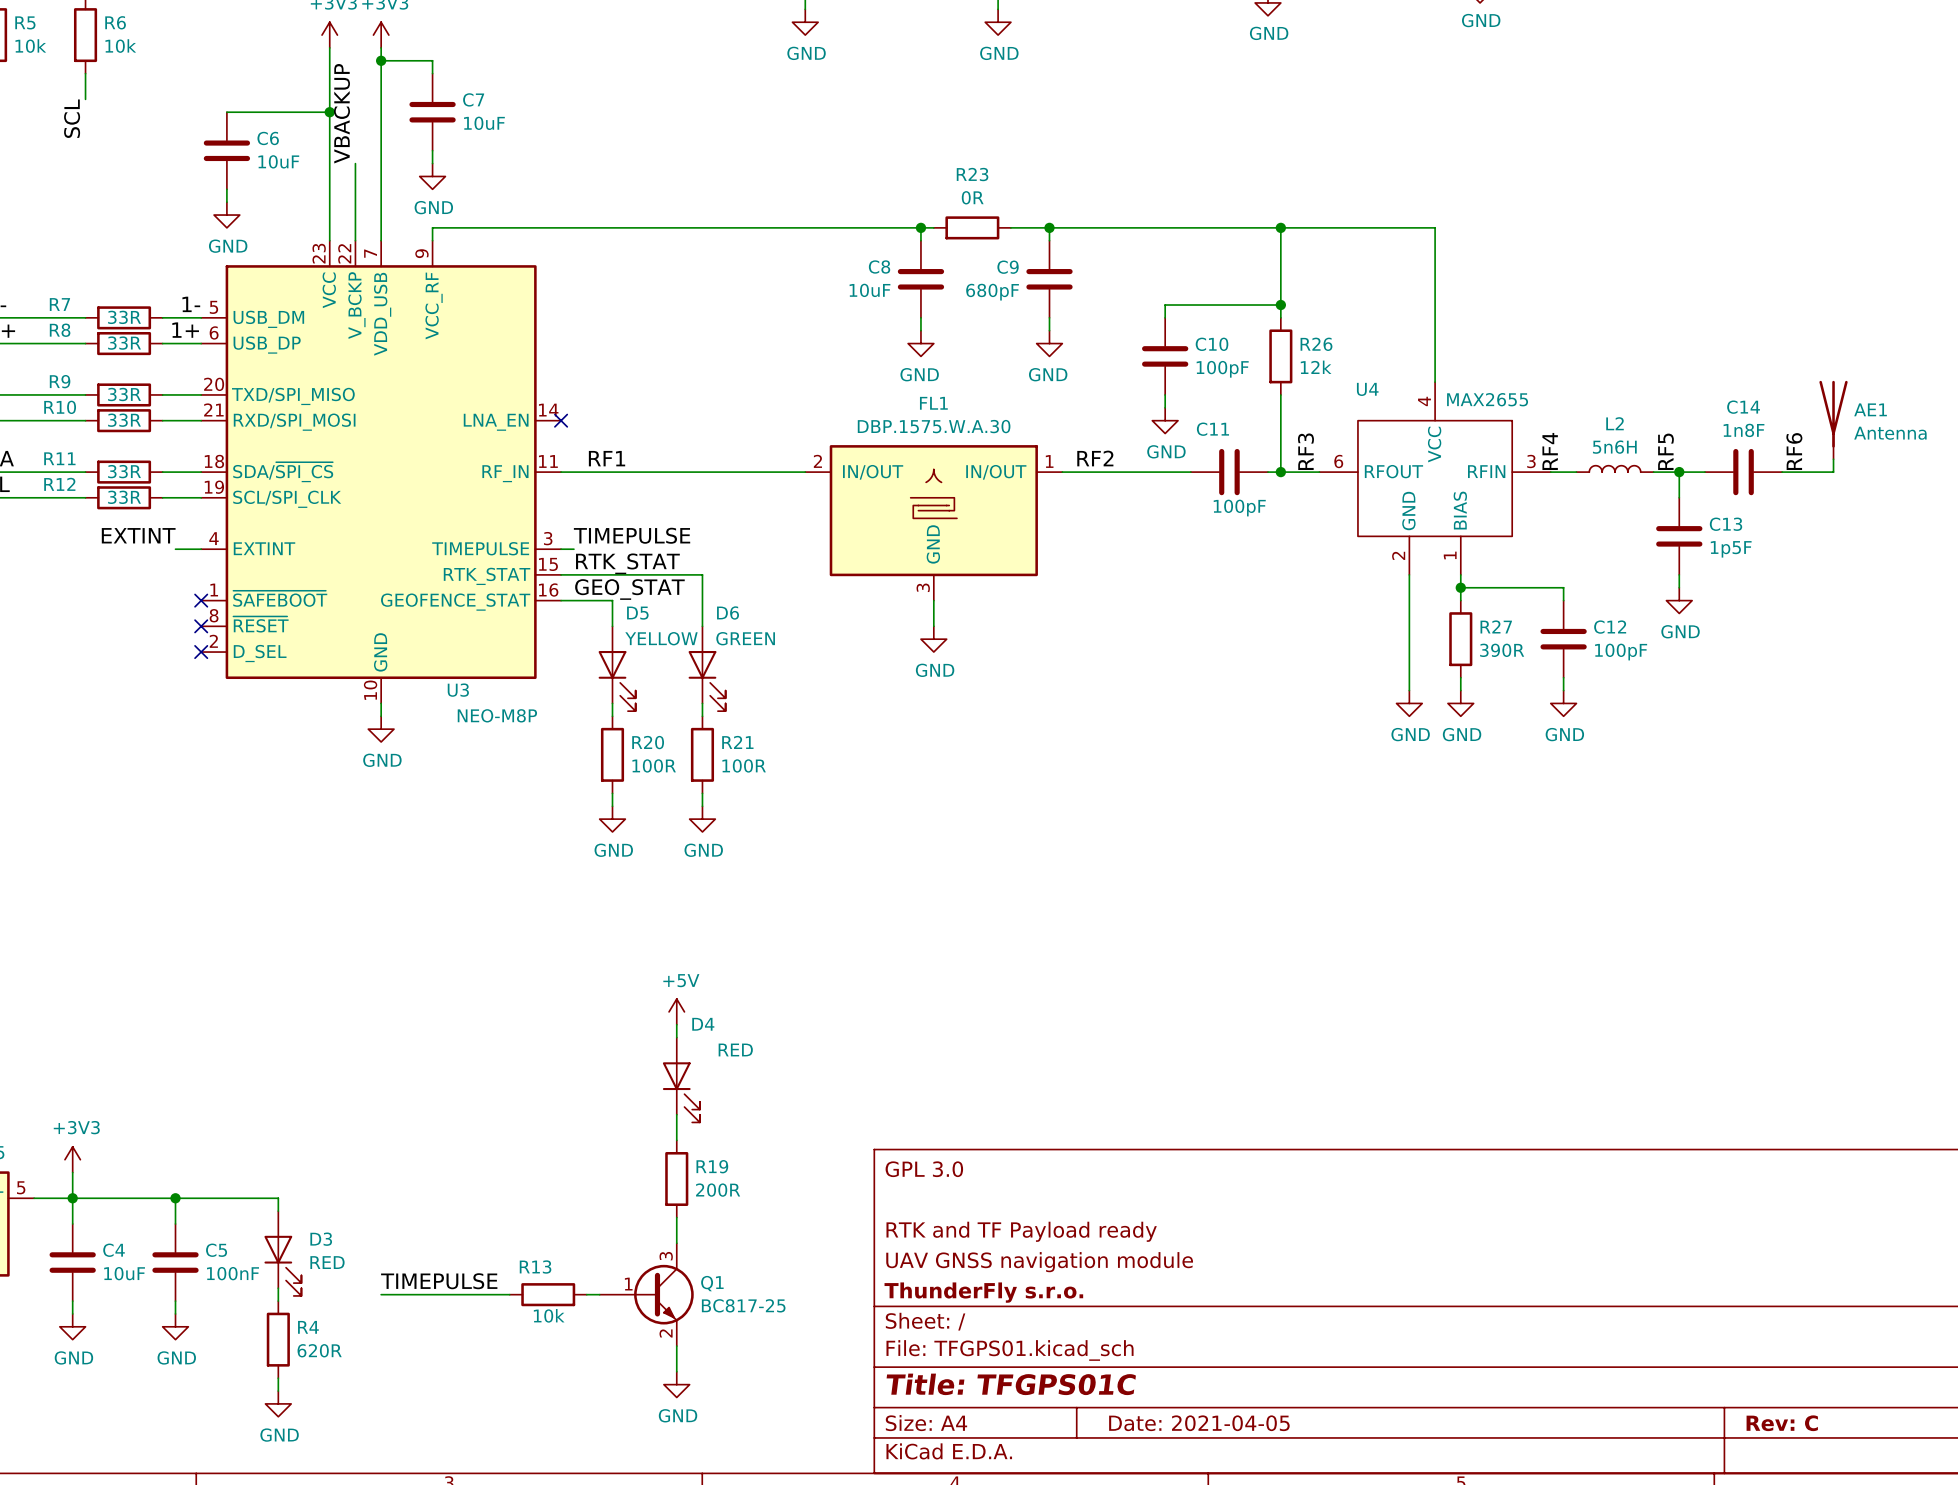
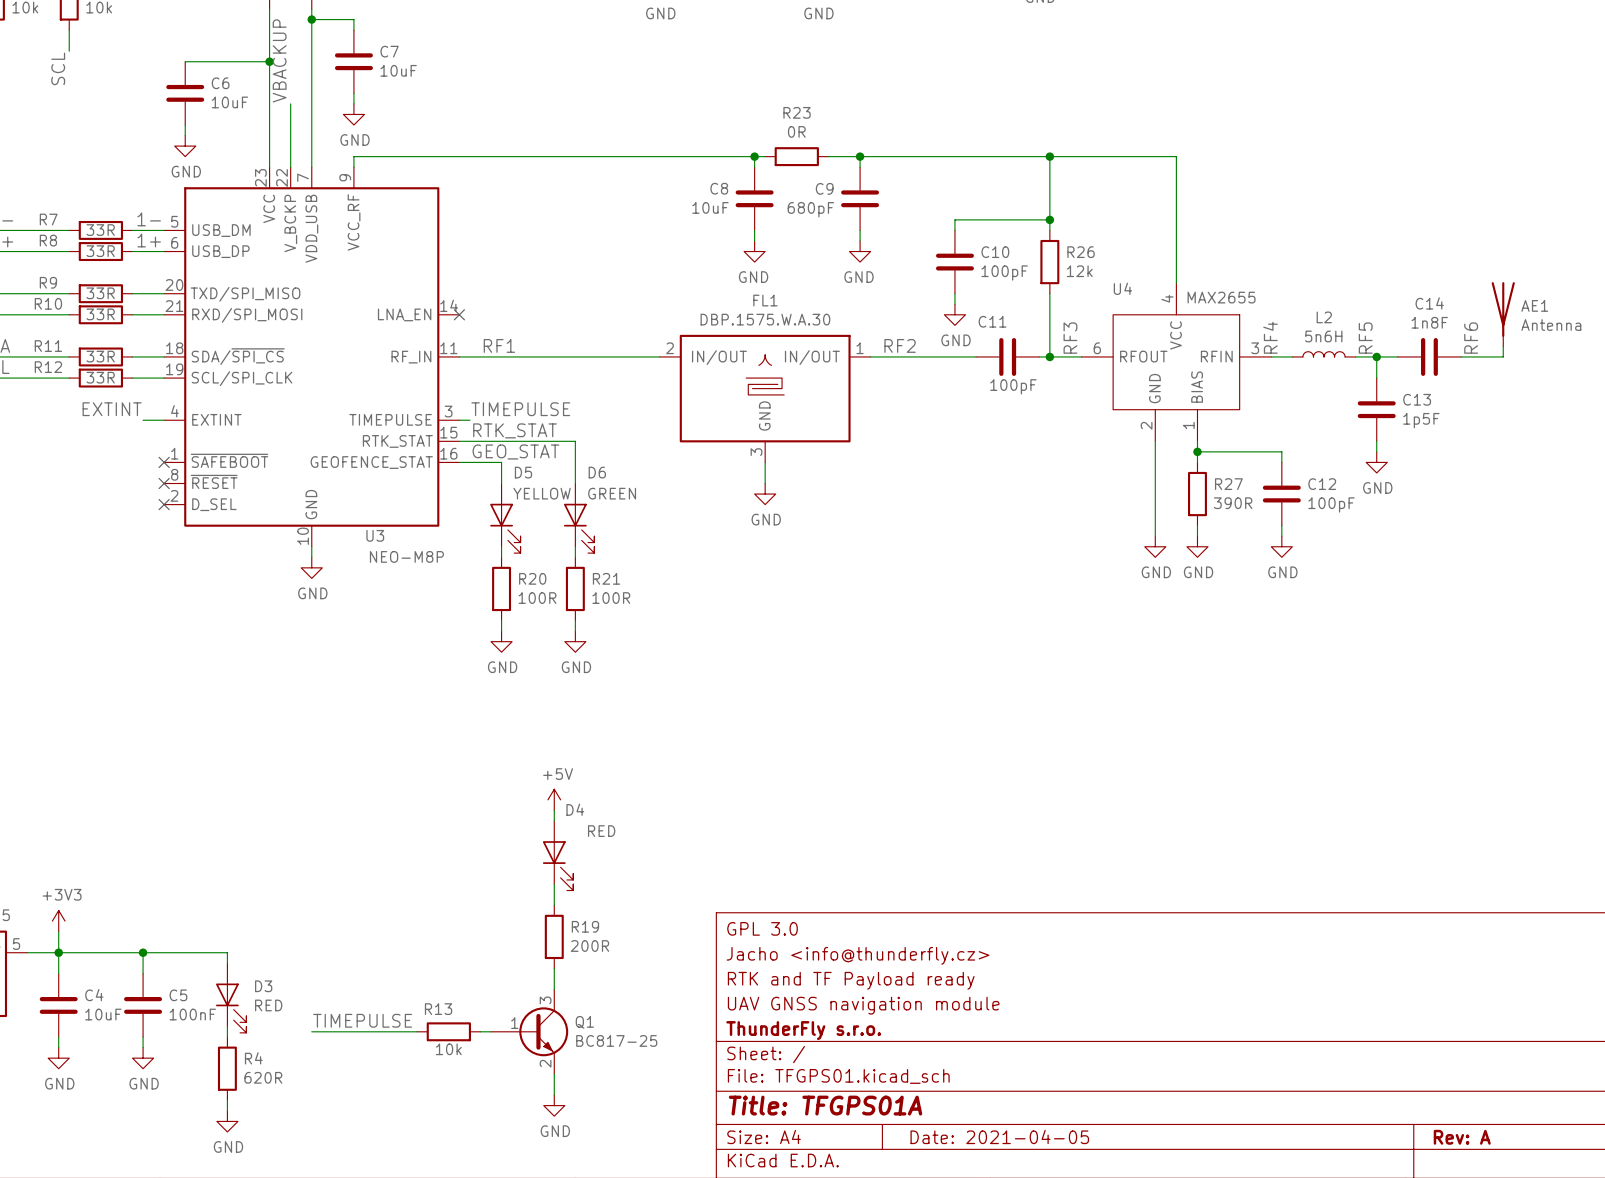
title block: none -> Jacho <info@thunderfly.cz> (858, 955)
title block: Title: TFGPS01C (1011, 1384) -> Title: TFGPS01A (825, 1105)
title block: Rev: C (1782, 1423) -> Rev: A (1462, 1137)

